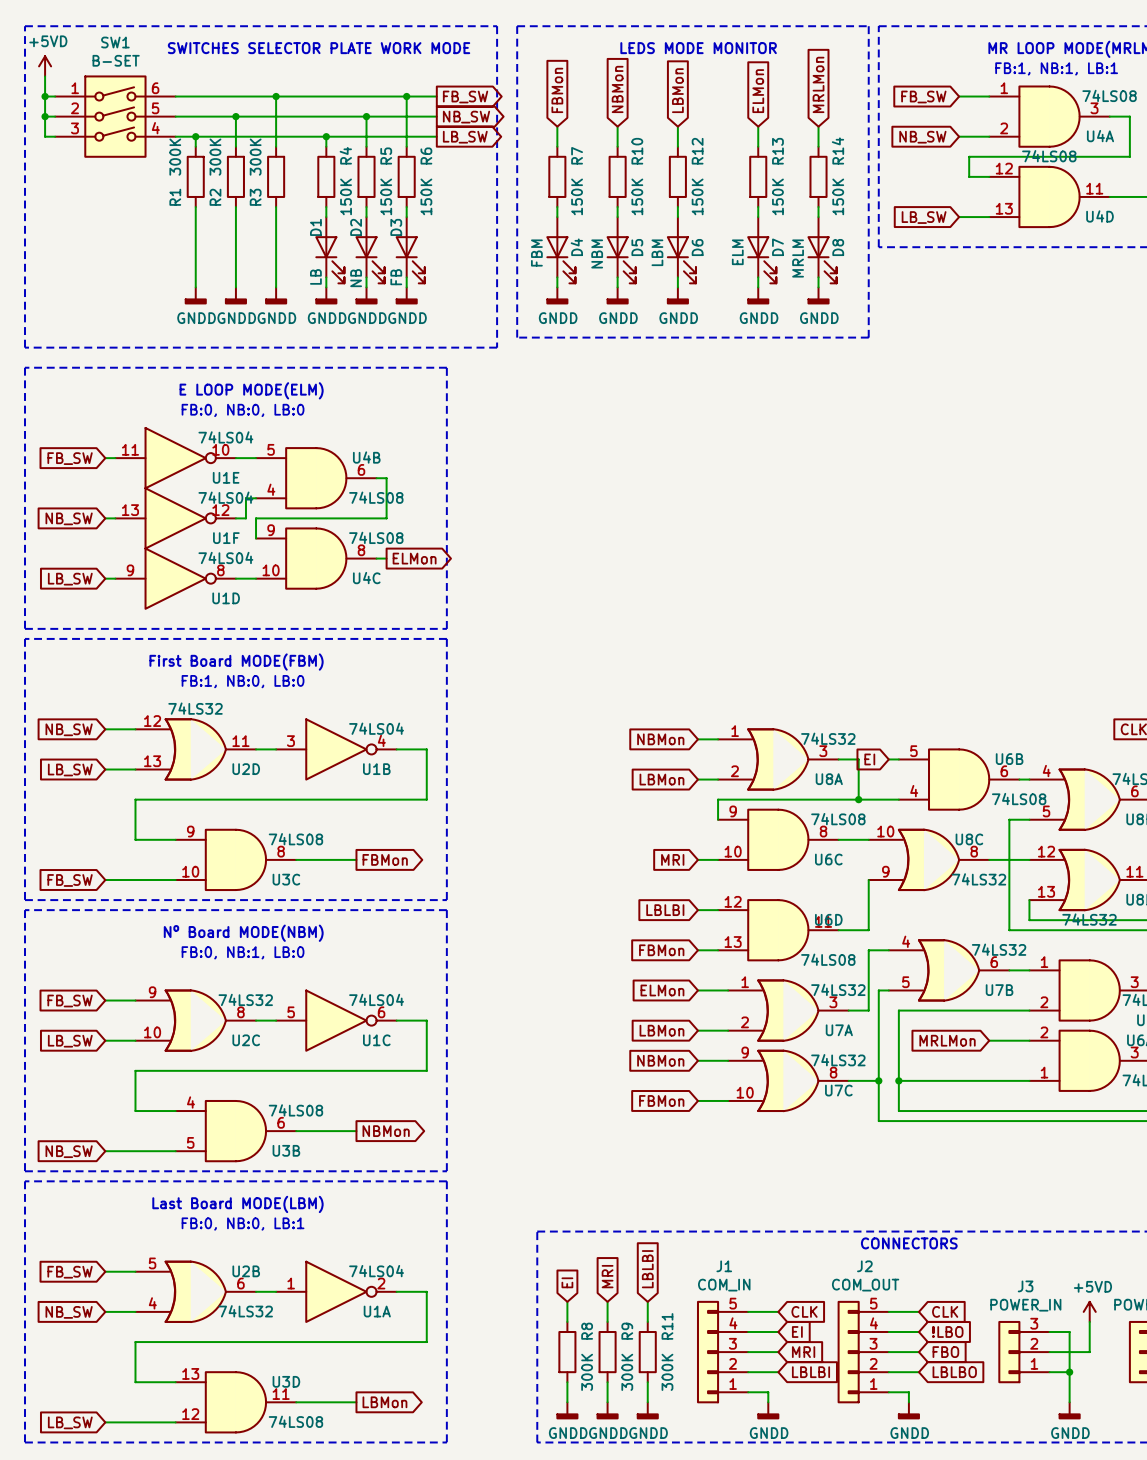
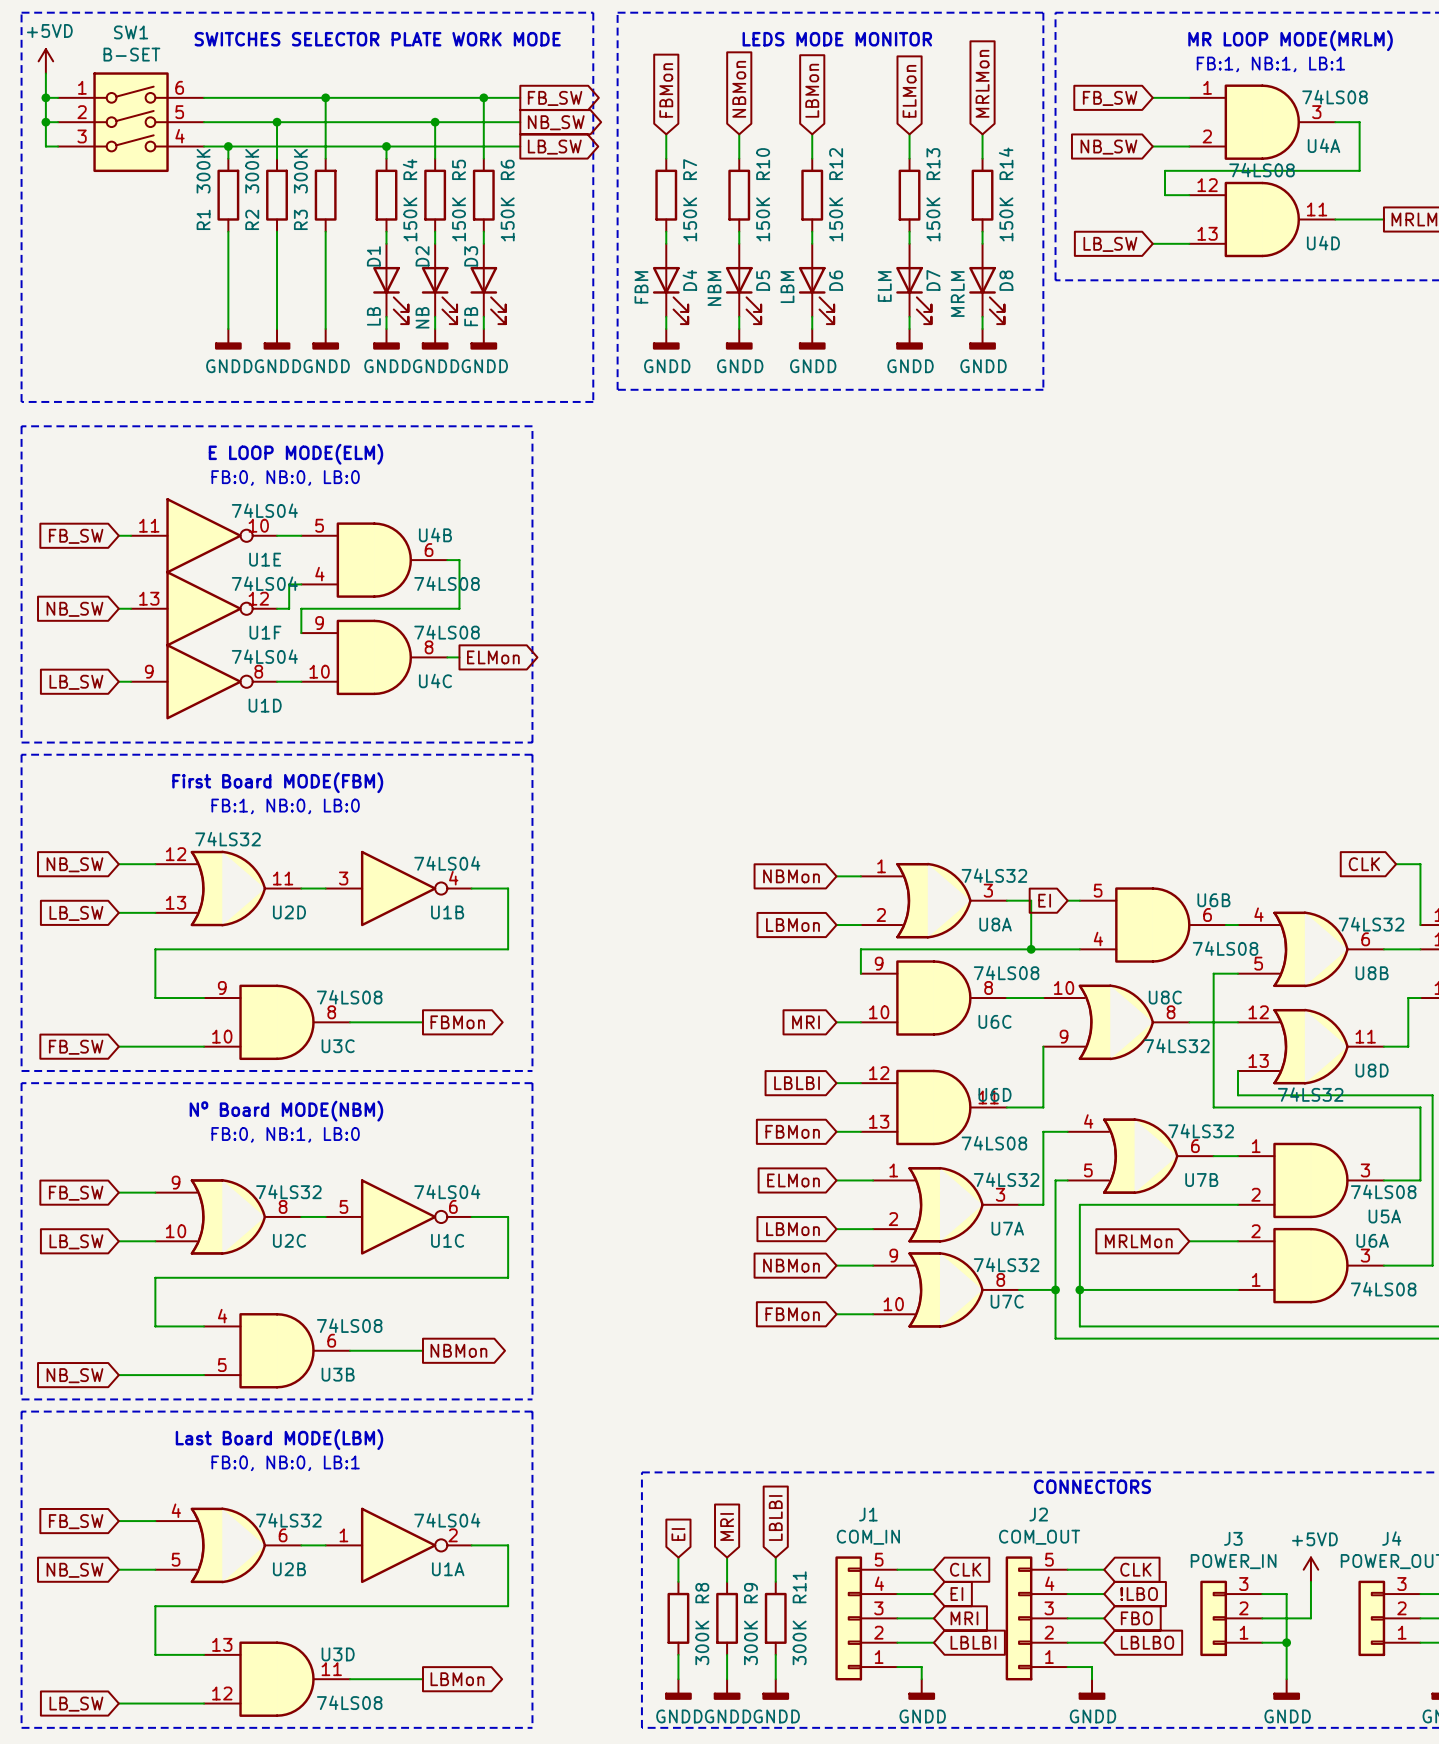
U2B flip: as is (195, 1291) -> up-down (228, 1545)

